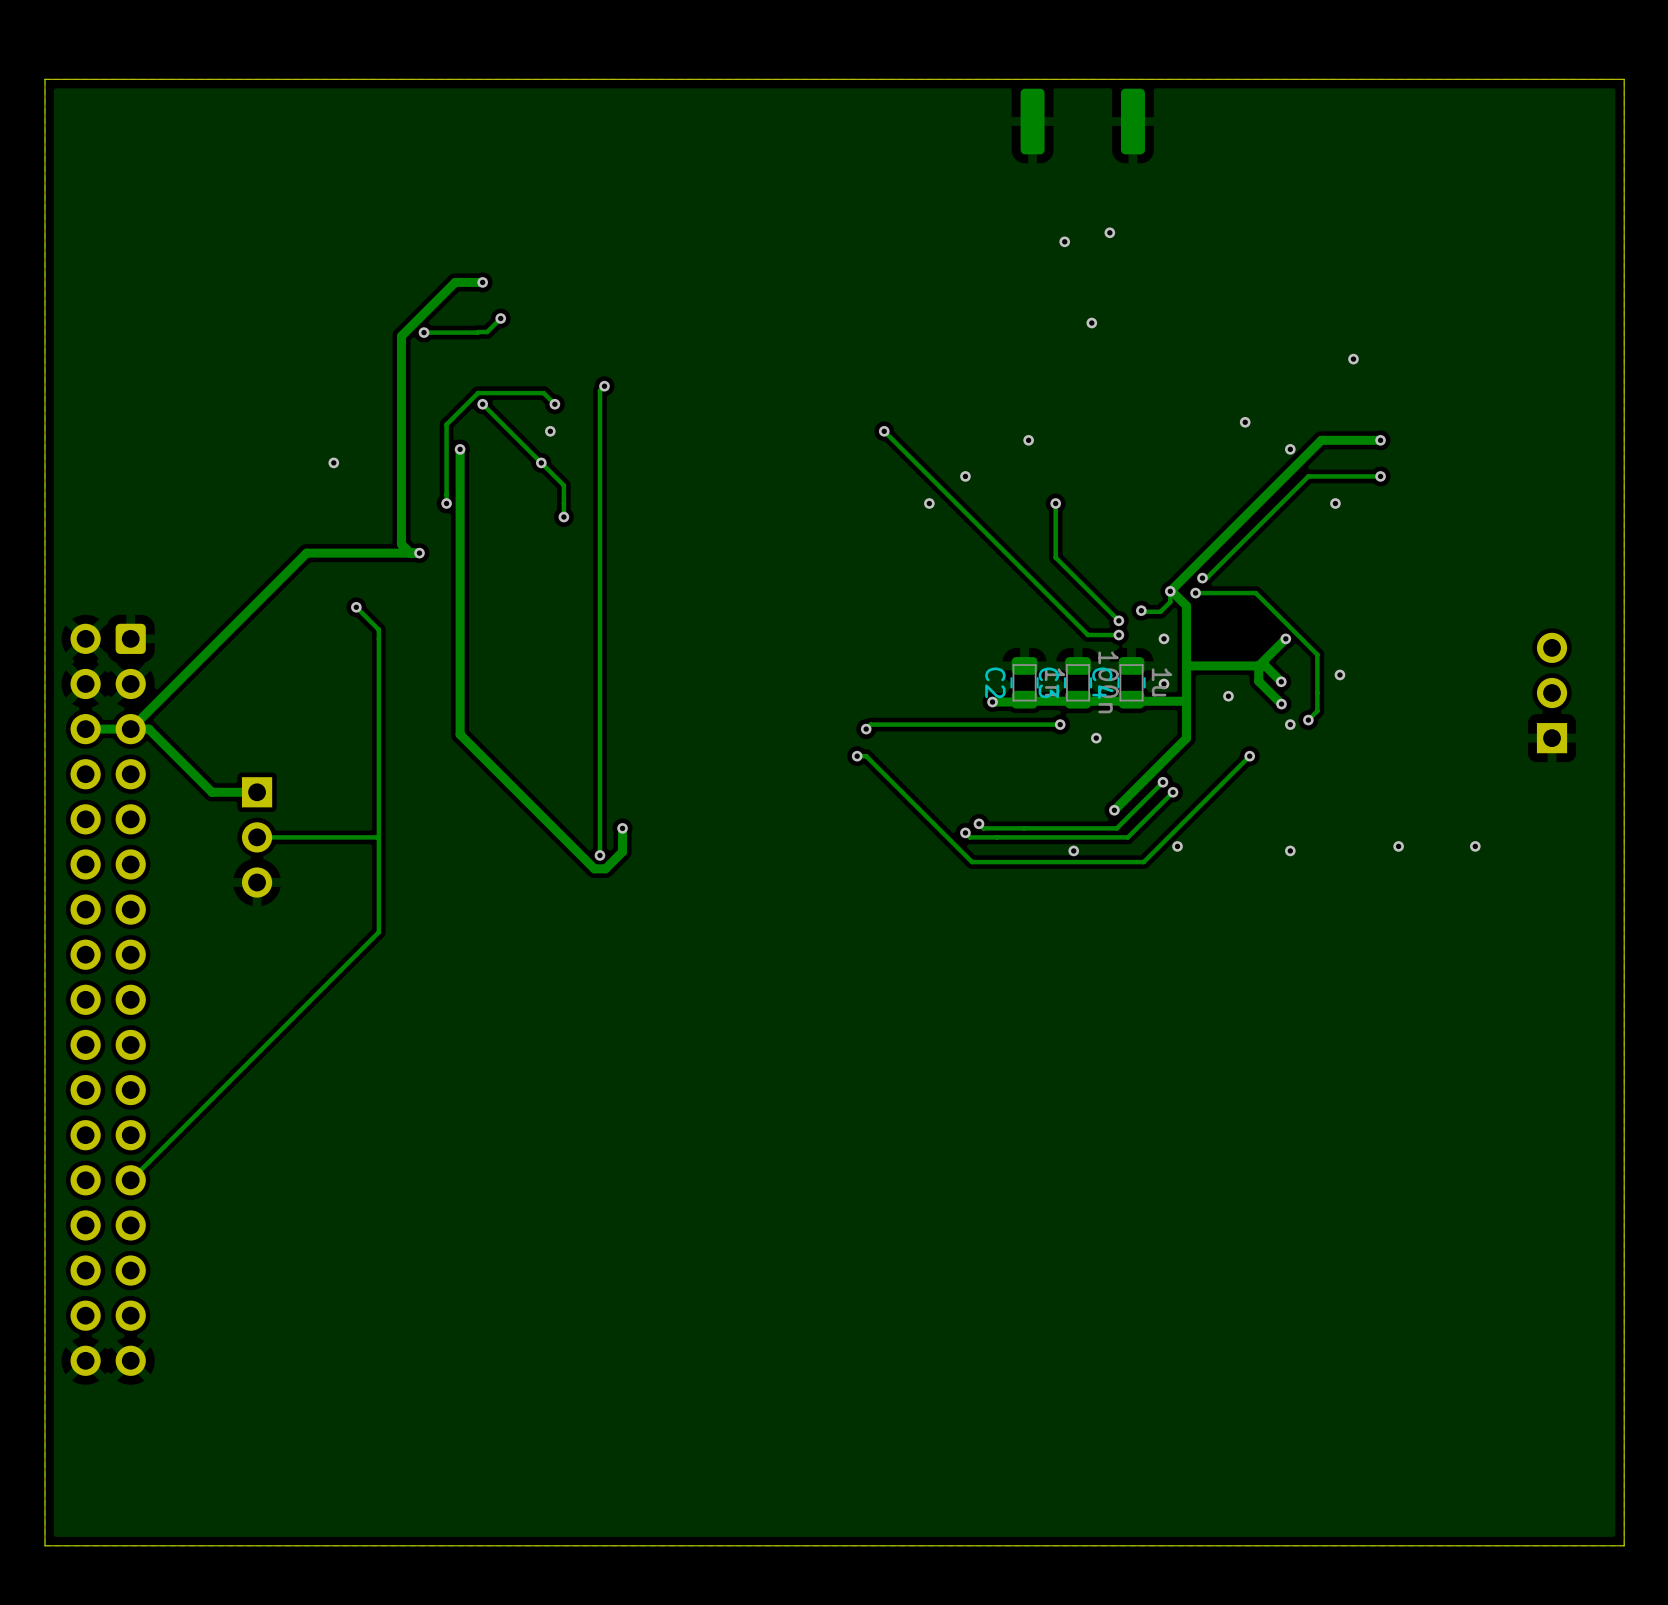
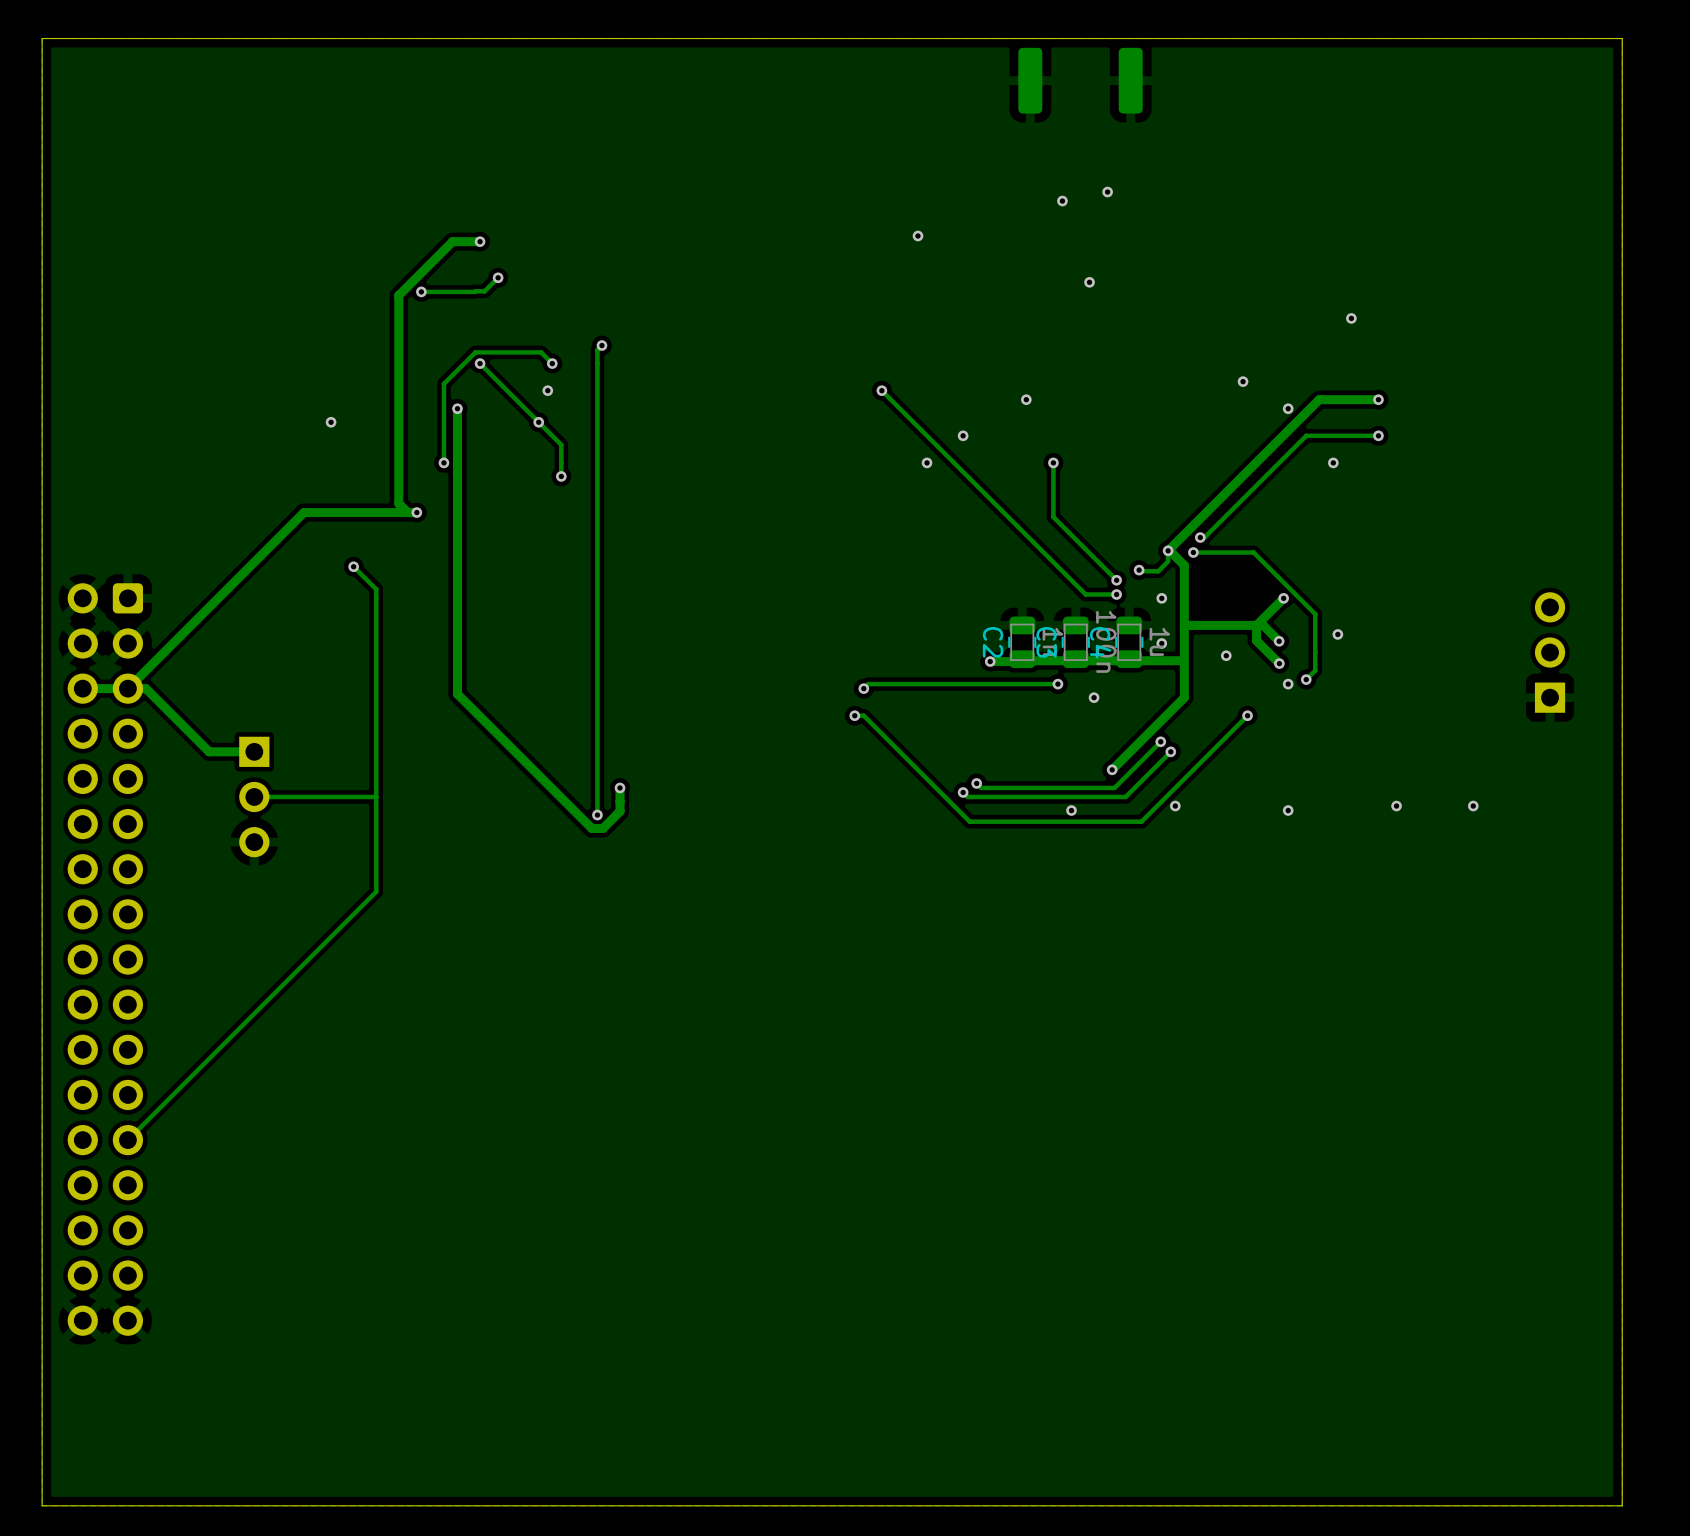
via: none -> (917, 235)

